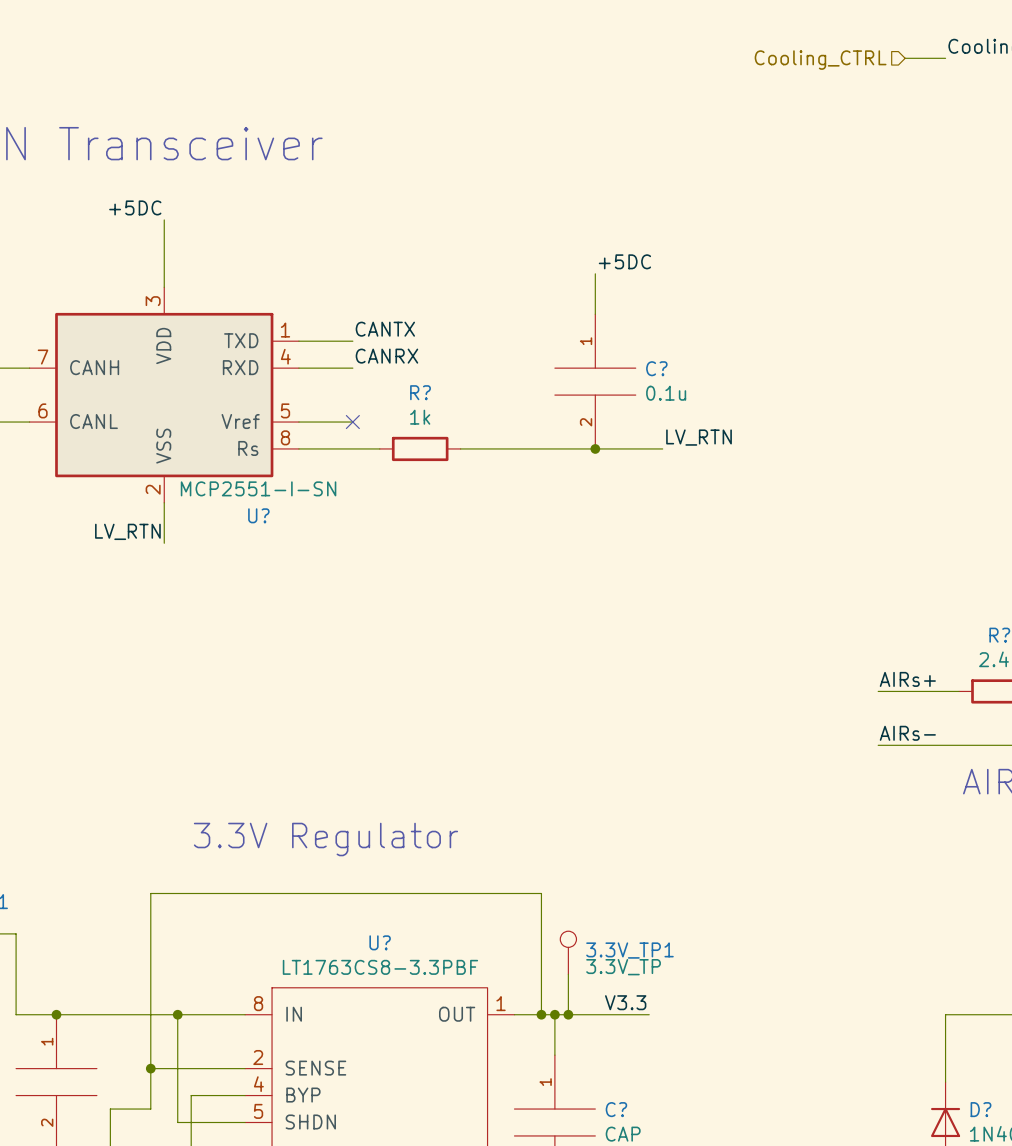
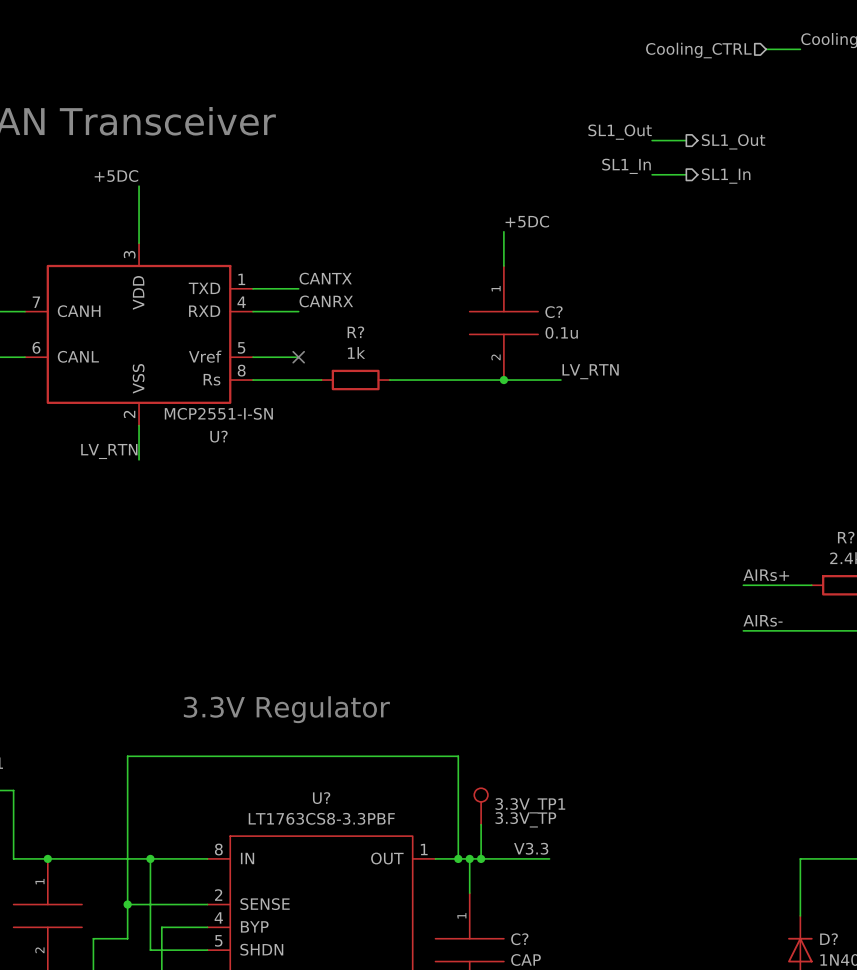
label: none -> SL1_Out (620, 132)
wire: none -> (652, 140) (686, 140)
hierarchical label: none -> SL1_Out (733, 141)
label: none -> SL1_In (626, 166)
wire: none -> (652, 174) (686, 174)
hierarchical label: none -> SL1_In (726, 176)

